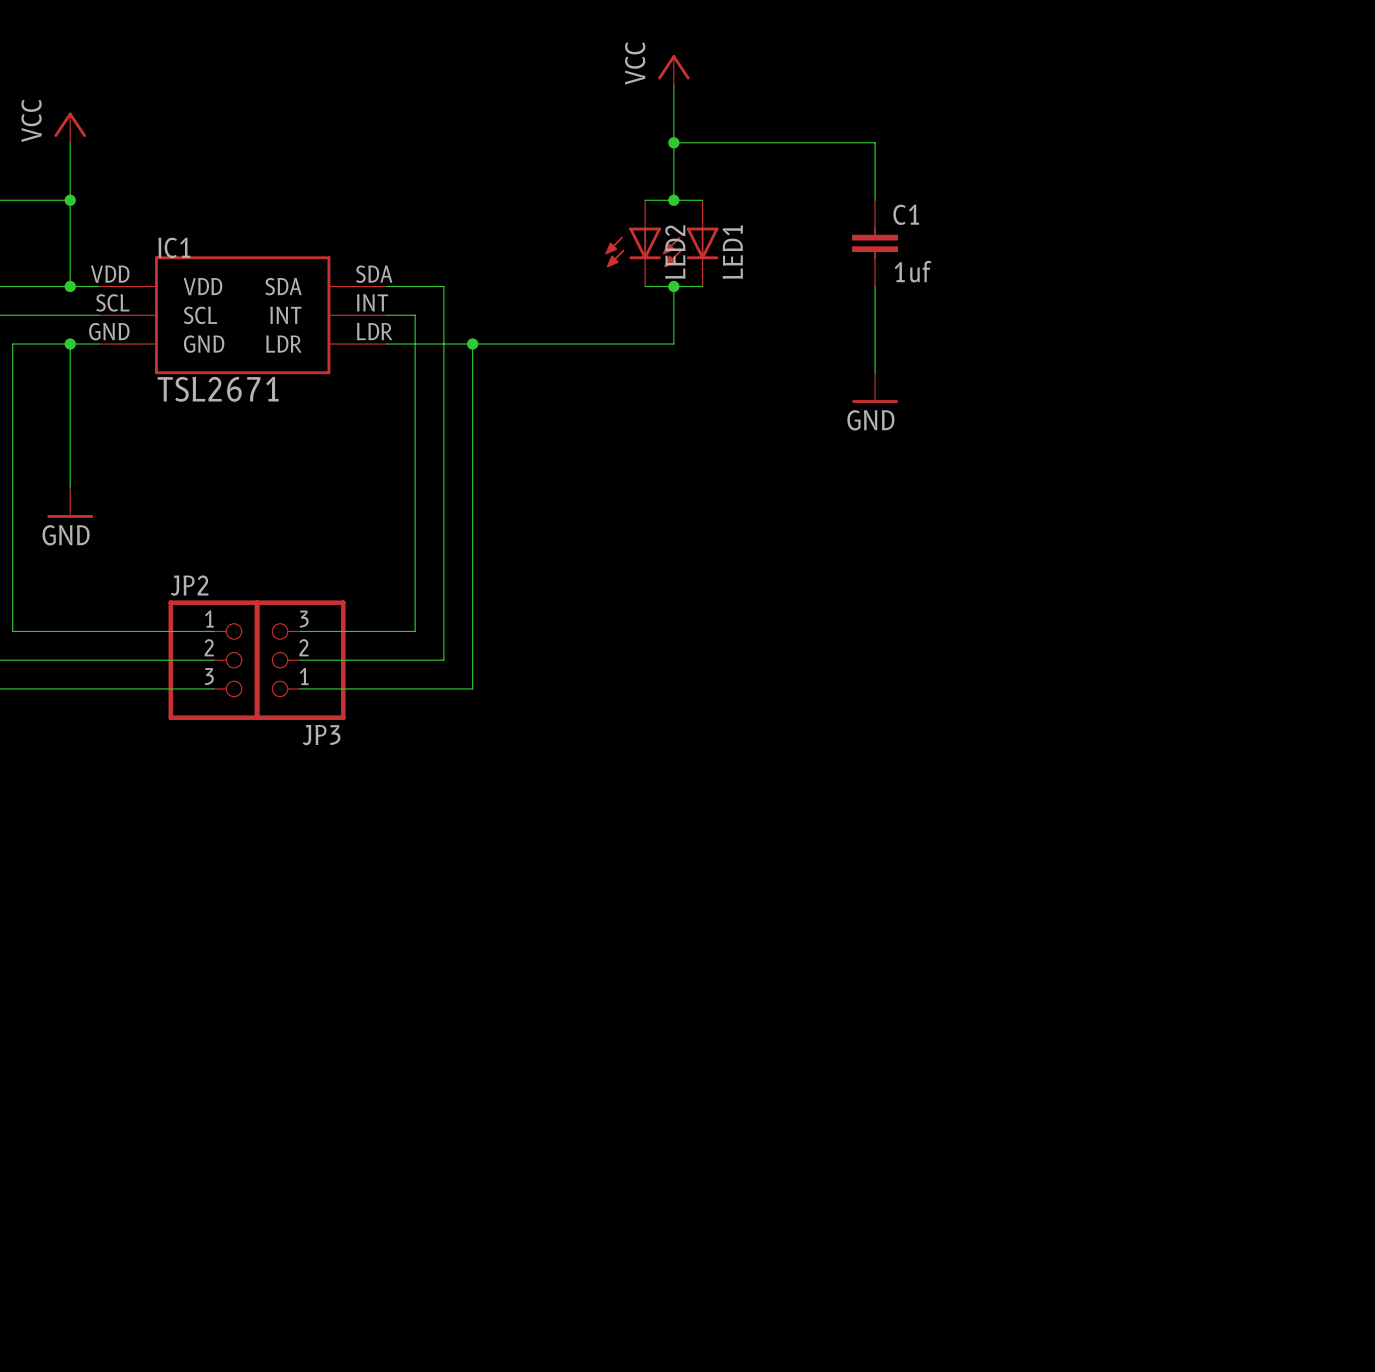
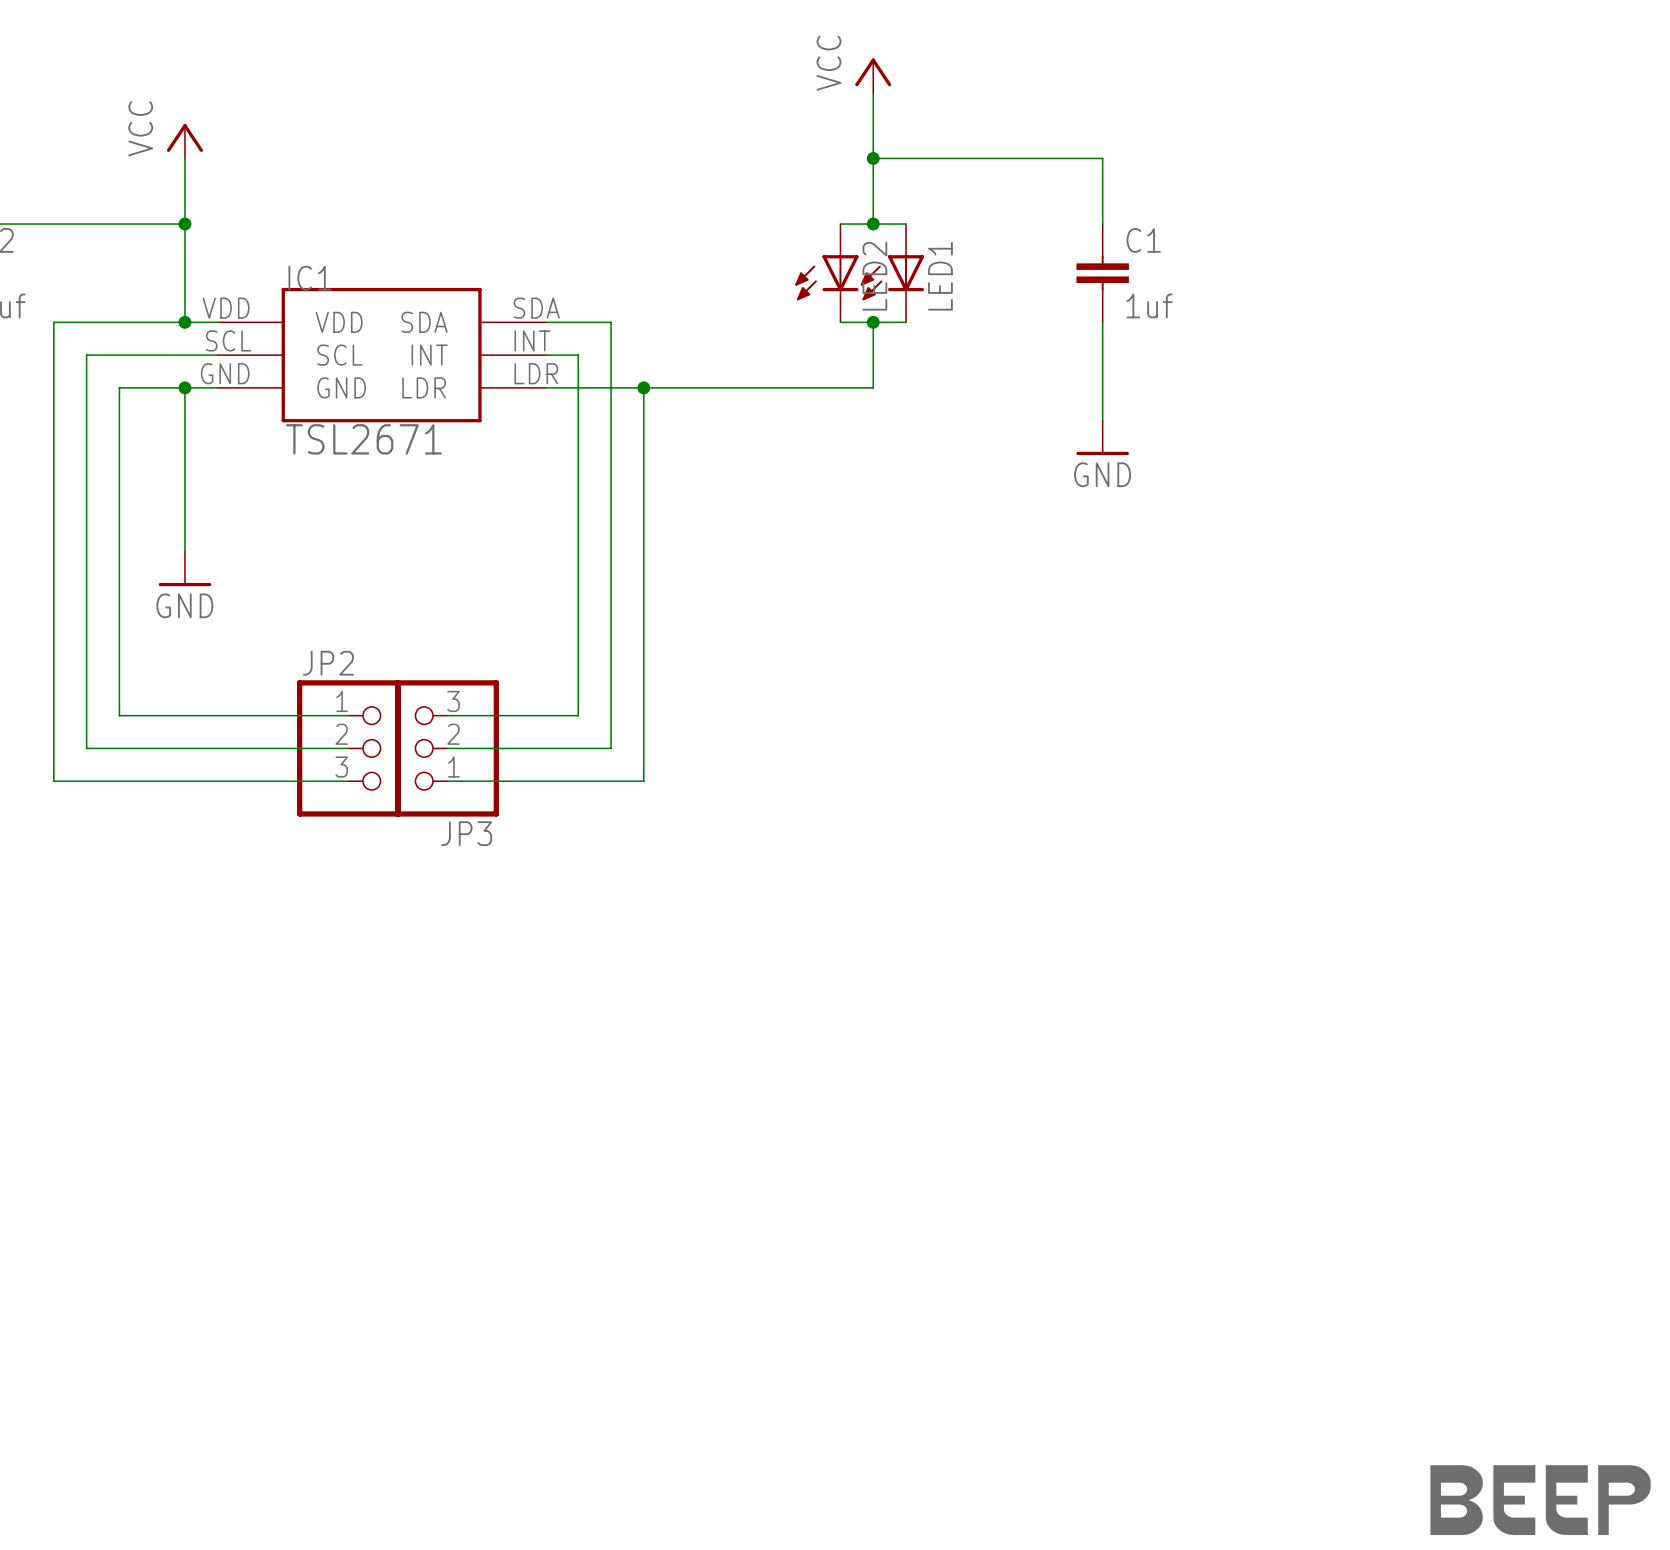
part: none -> (1540, 1500)

